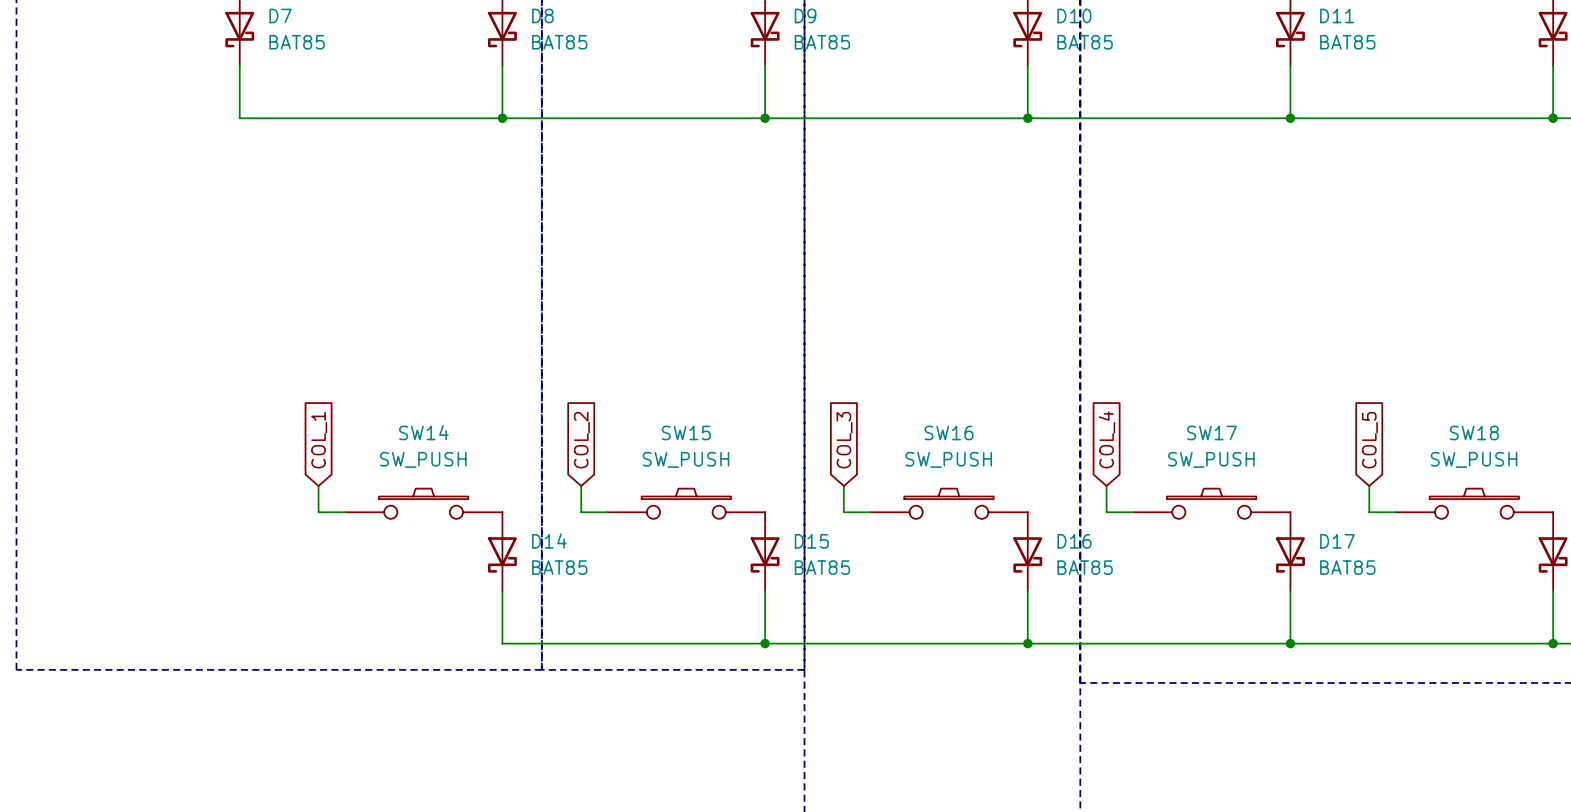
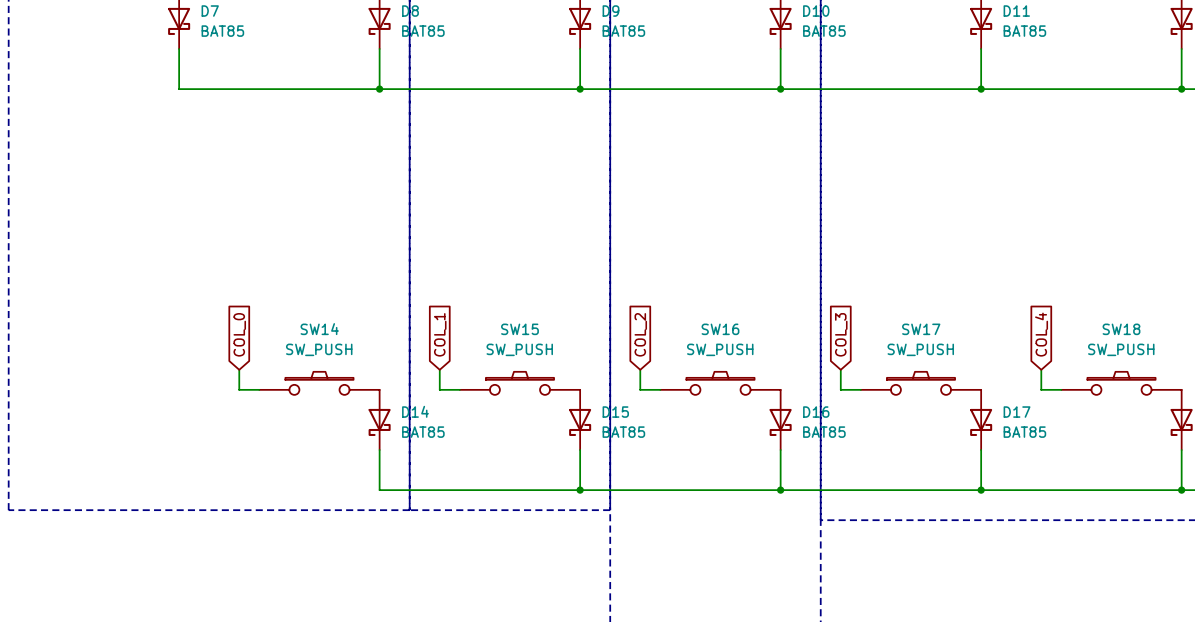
global label: COL_4 (1106, 439) -> COL_3 (841, 334)
global label: COL_1 (319, 440) -> COL_0 (239, 334)
global label: COL_2 (581, 440) -> COL_1 (440, 334)
global label: COL_3 (844, 440) -> COL_2 (640, 334)
global label: COL_5 (1369, 440) -> COL_4 (1041, 334)

